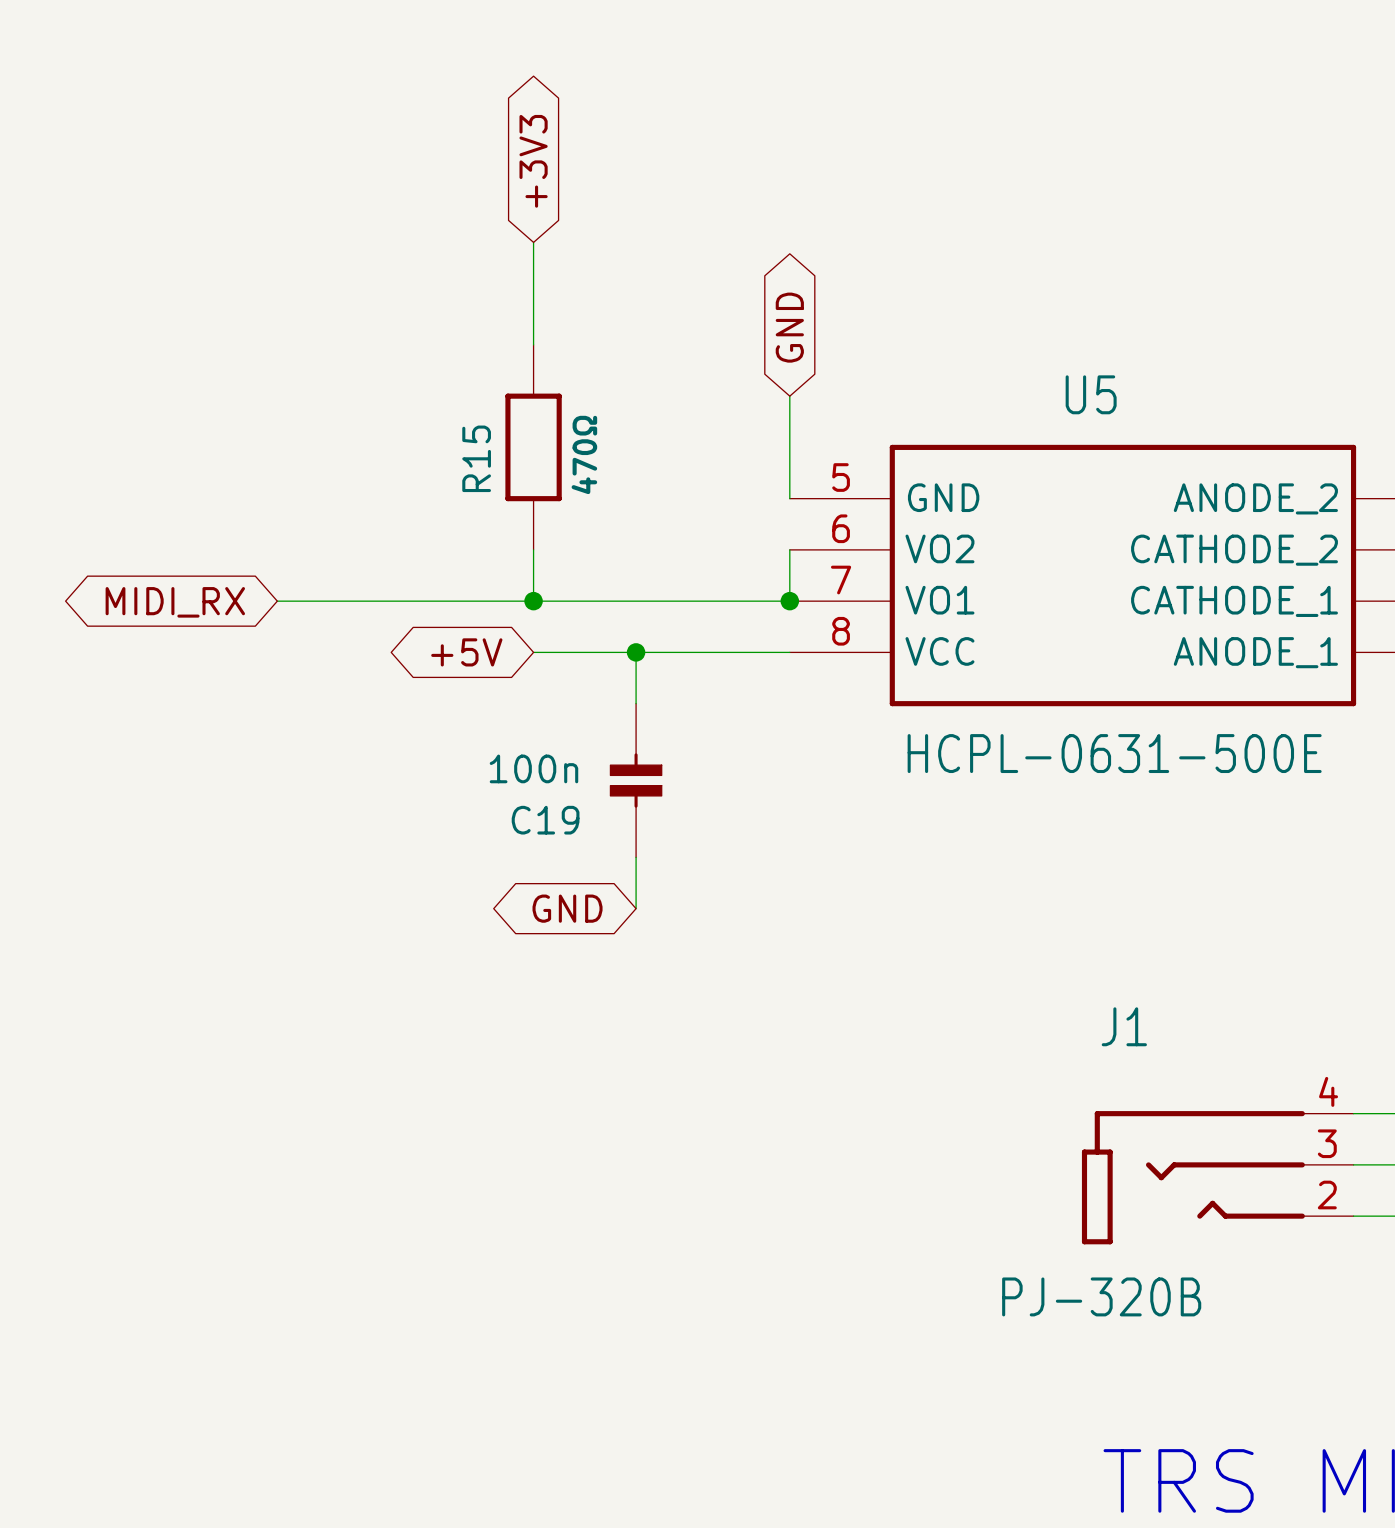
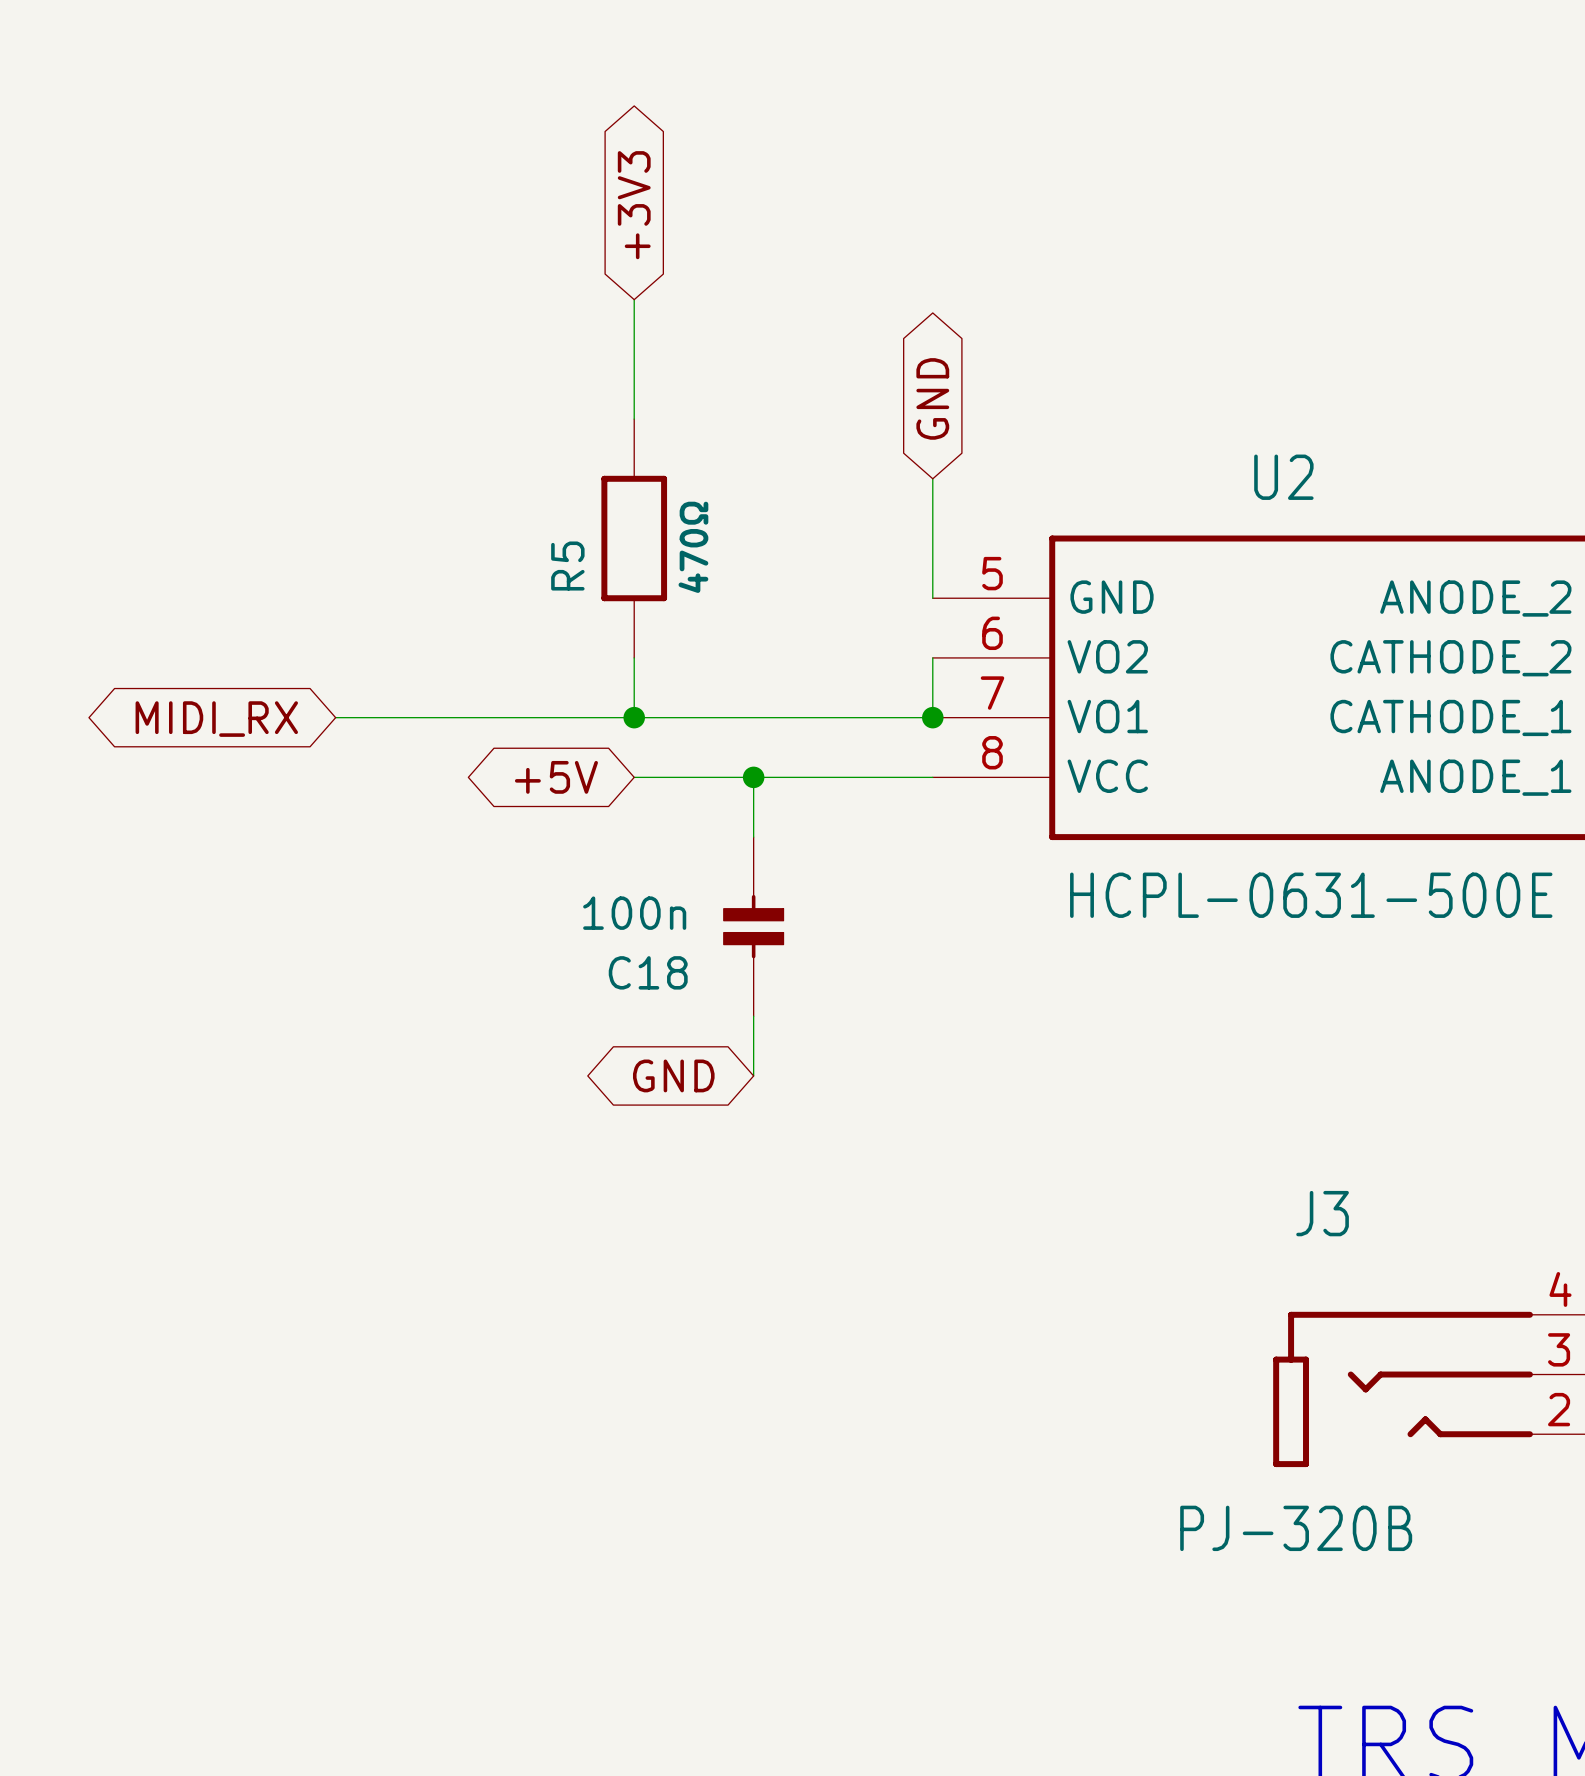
U5 name: U5 (1091, 394) -> U2 (1283, 477)
R15 name: R15 (476, 458) -> R5 (567, 566)
C19 name: C19 (545, 820) -> C18 (648, 972)
J1 name: J1 (1124, 1026) -> J3 (1322, 1213)

